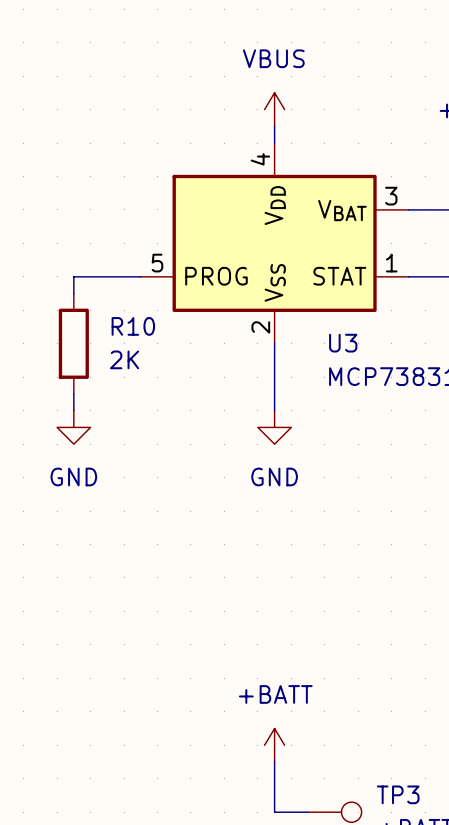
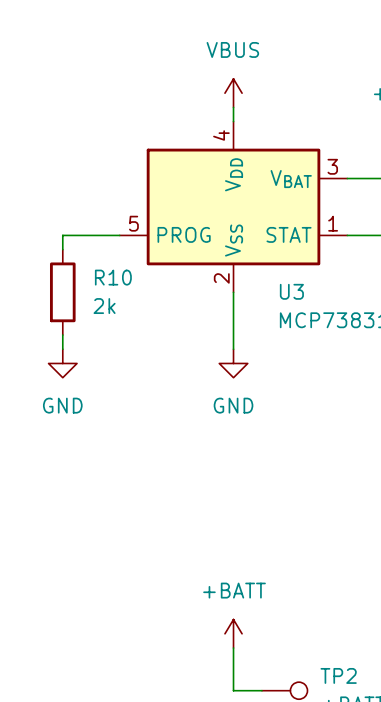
R10 value: 2K (124, 359) -> 2k (104, 306)
TP3 name: TP3 (398, 794) -> TP2 (338, 675)

